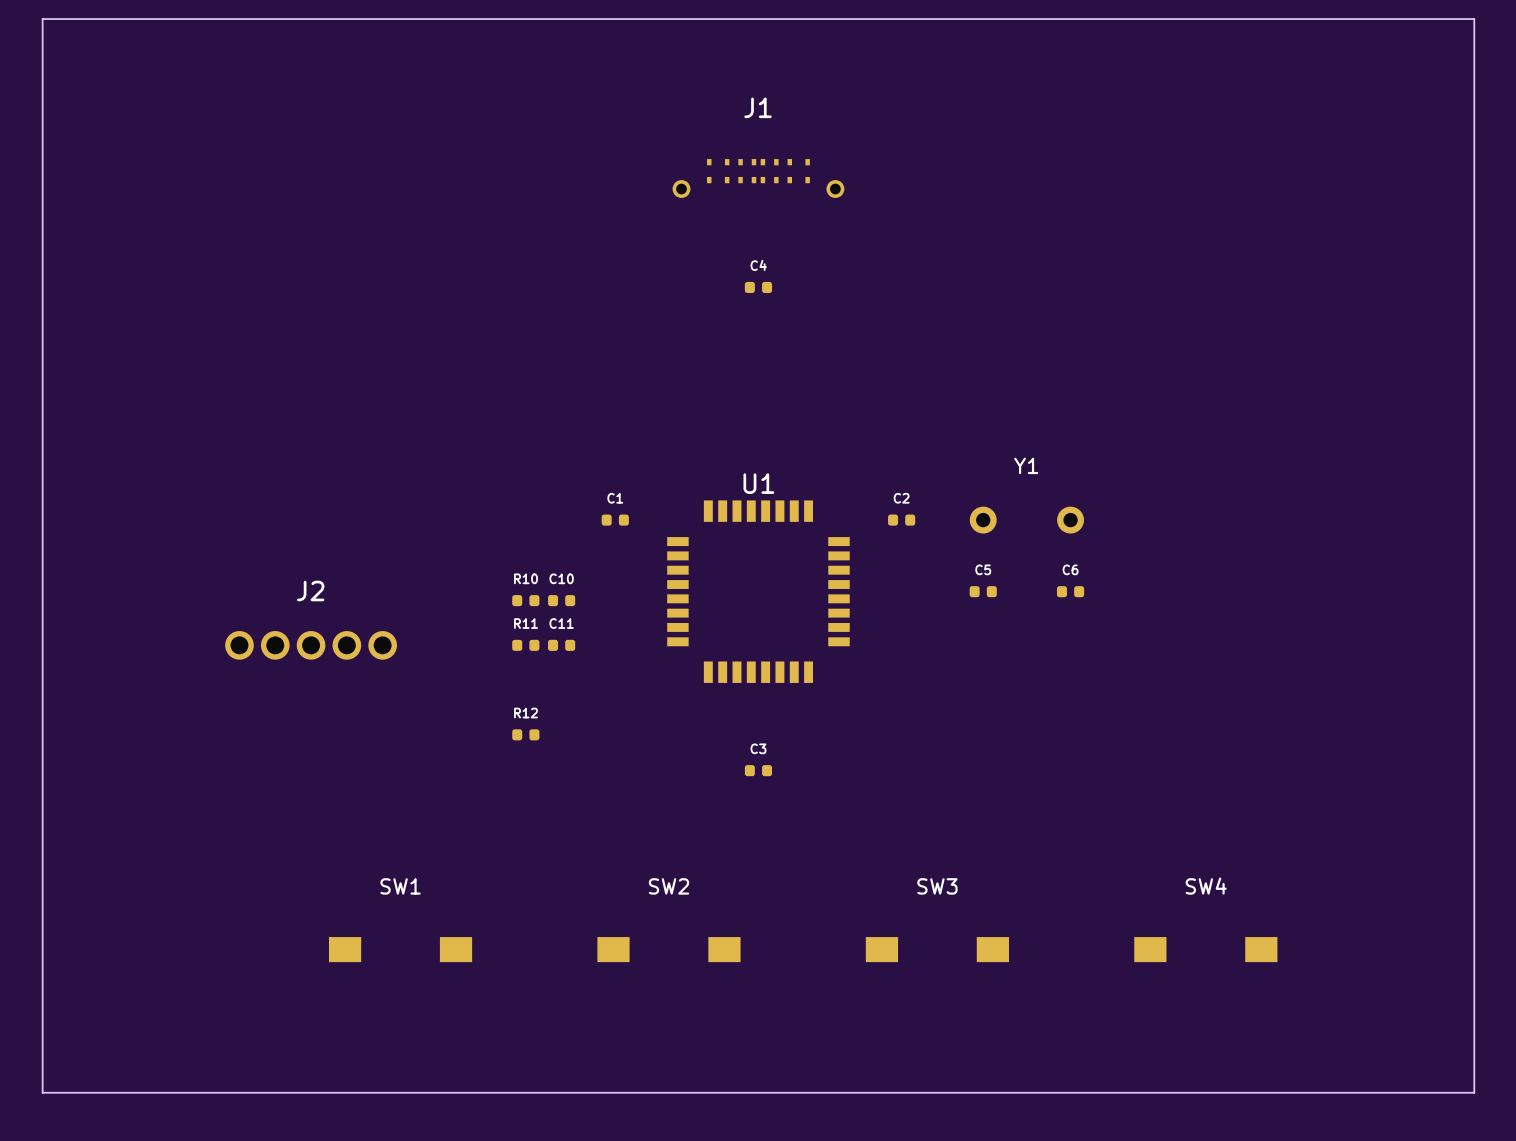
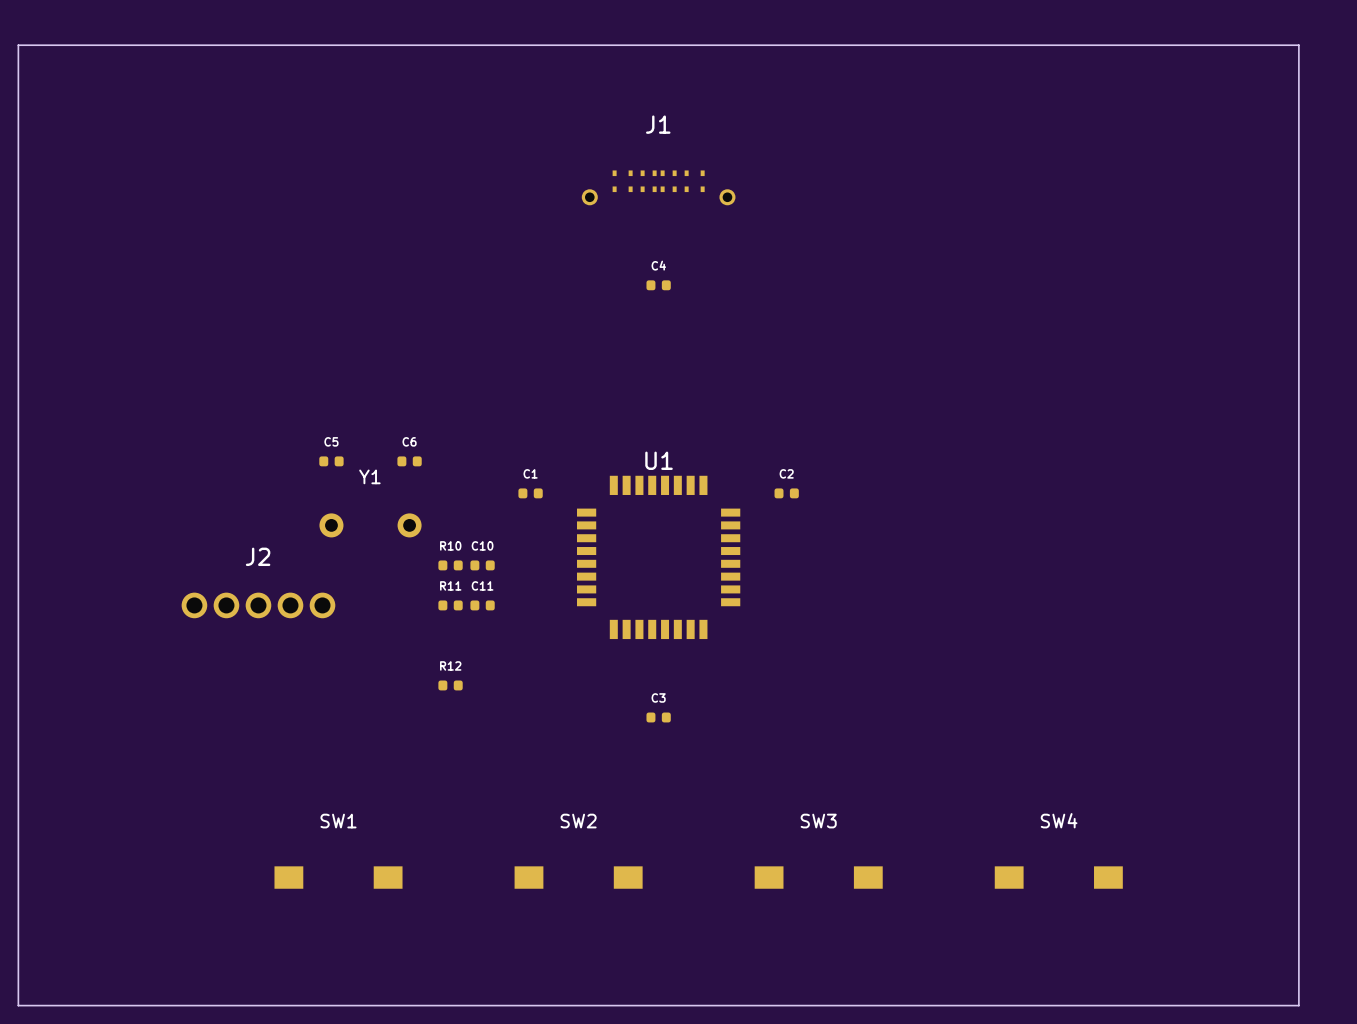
Y1 position: (1026, 520) -> (370, 525)
C5 position: (983, 591) -> (331, 461)
C6 position: (1070, 591) -> (409, 461)

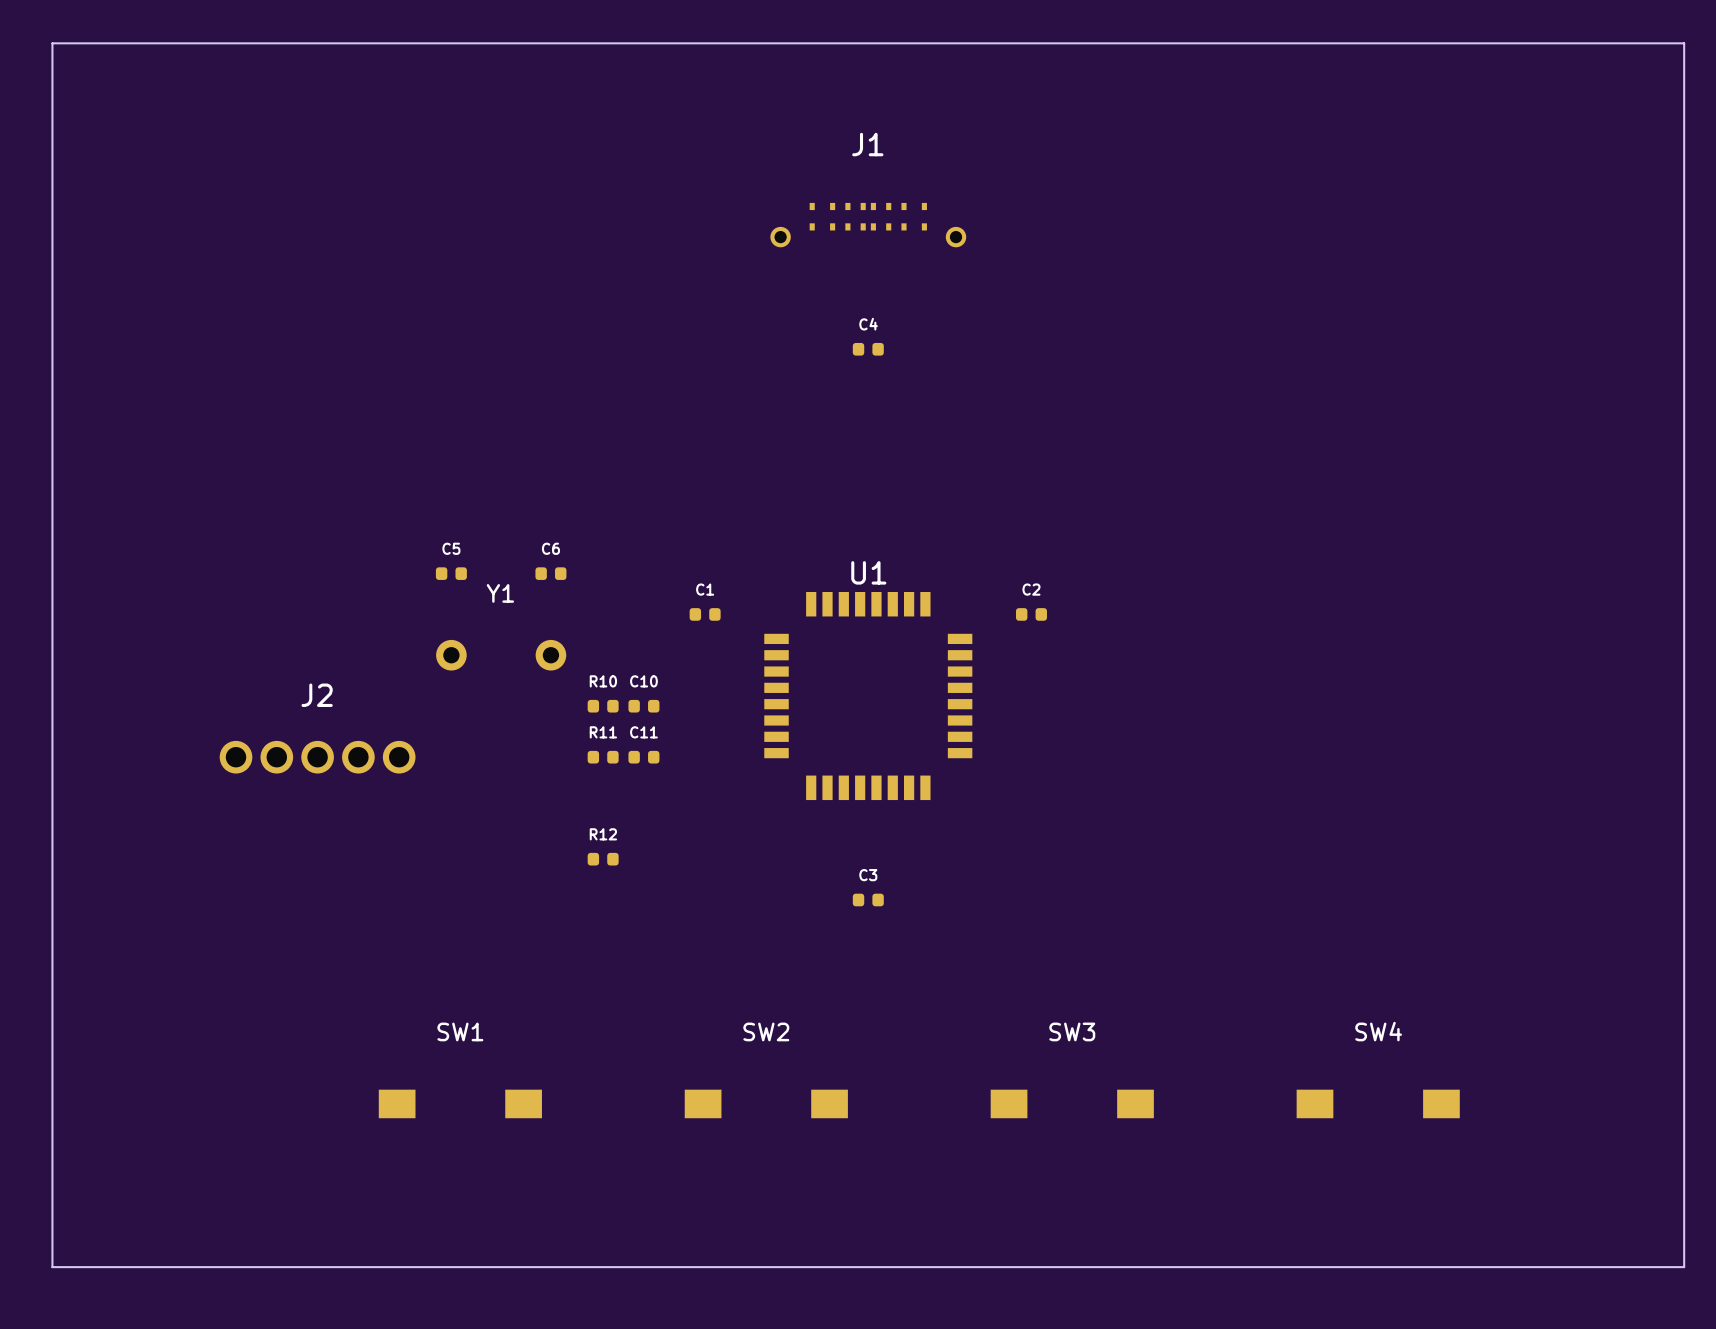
J2 position: (258, 605) -> (317, 757)

